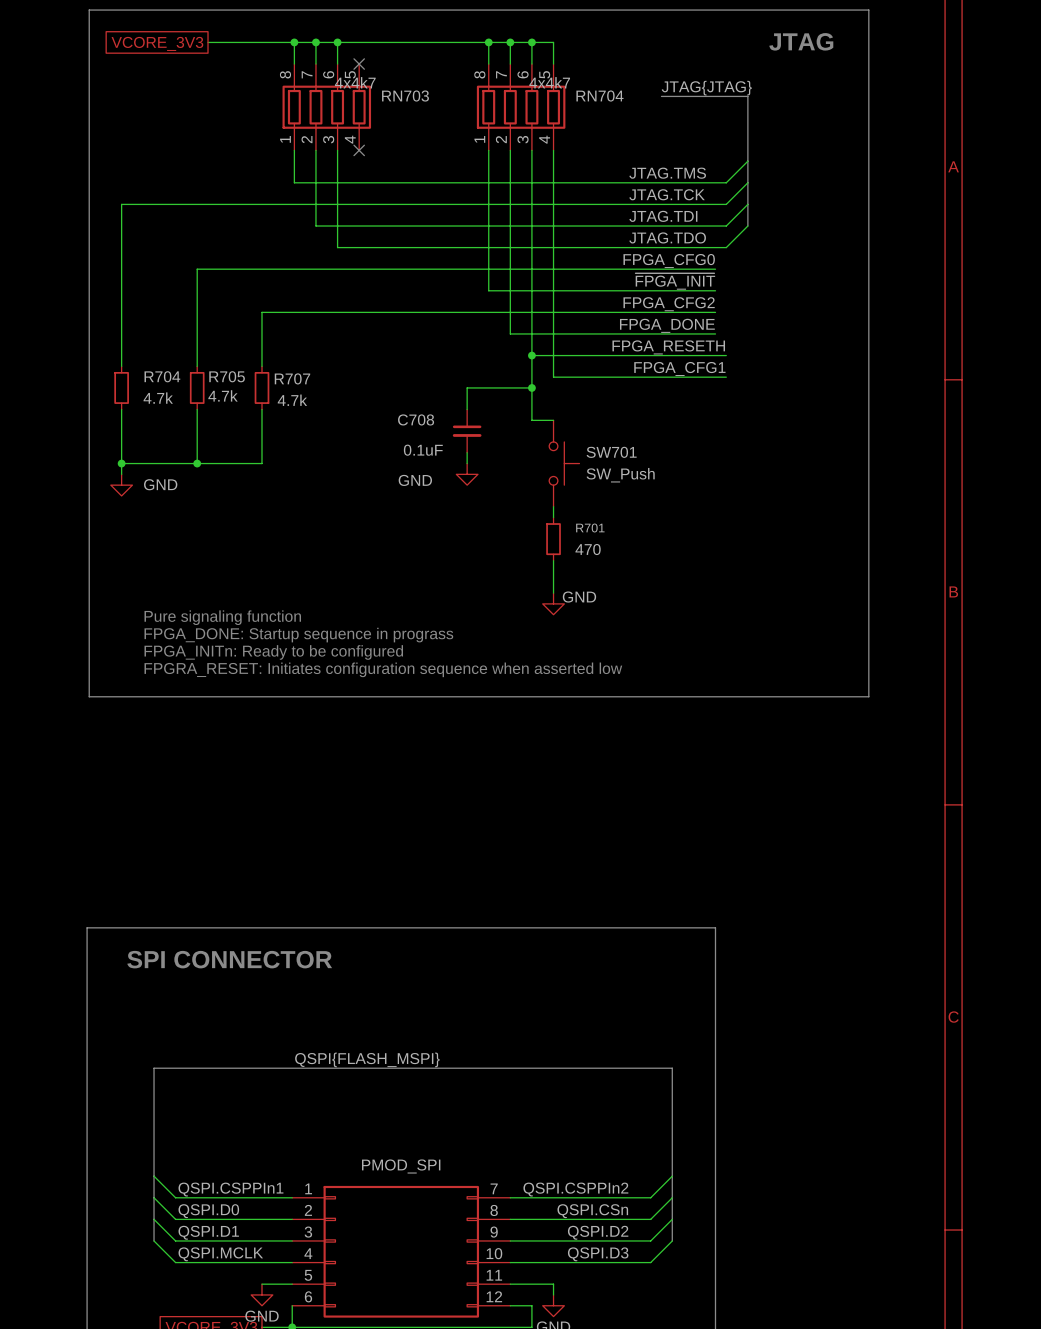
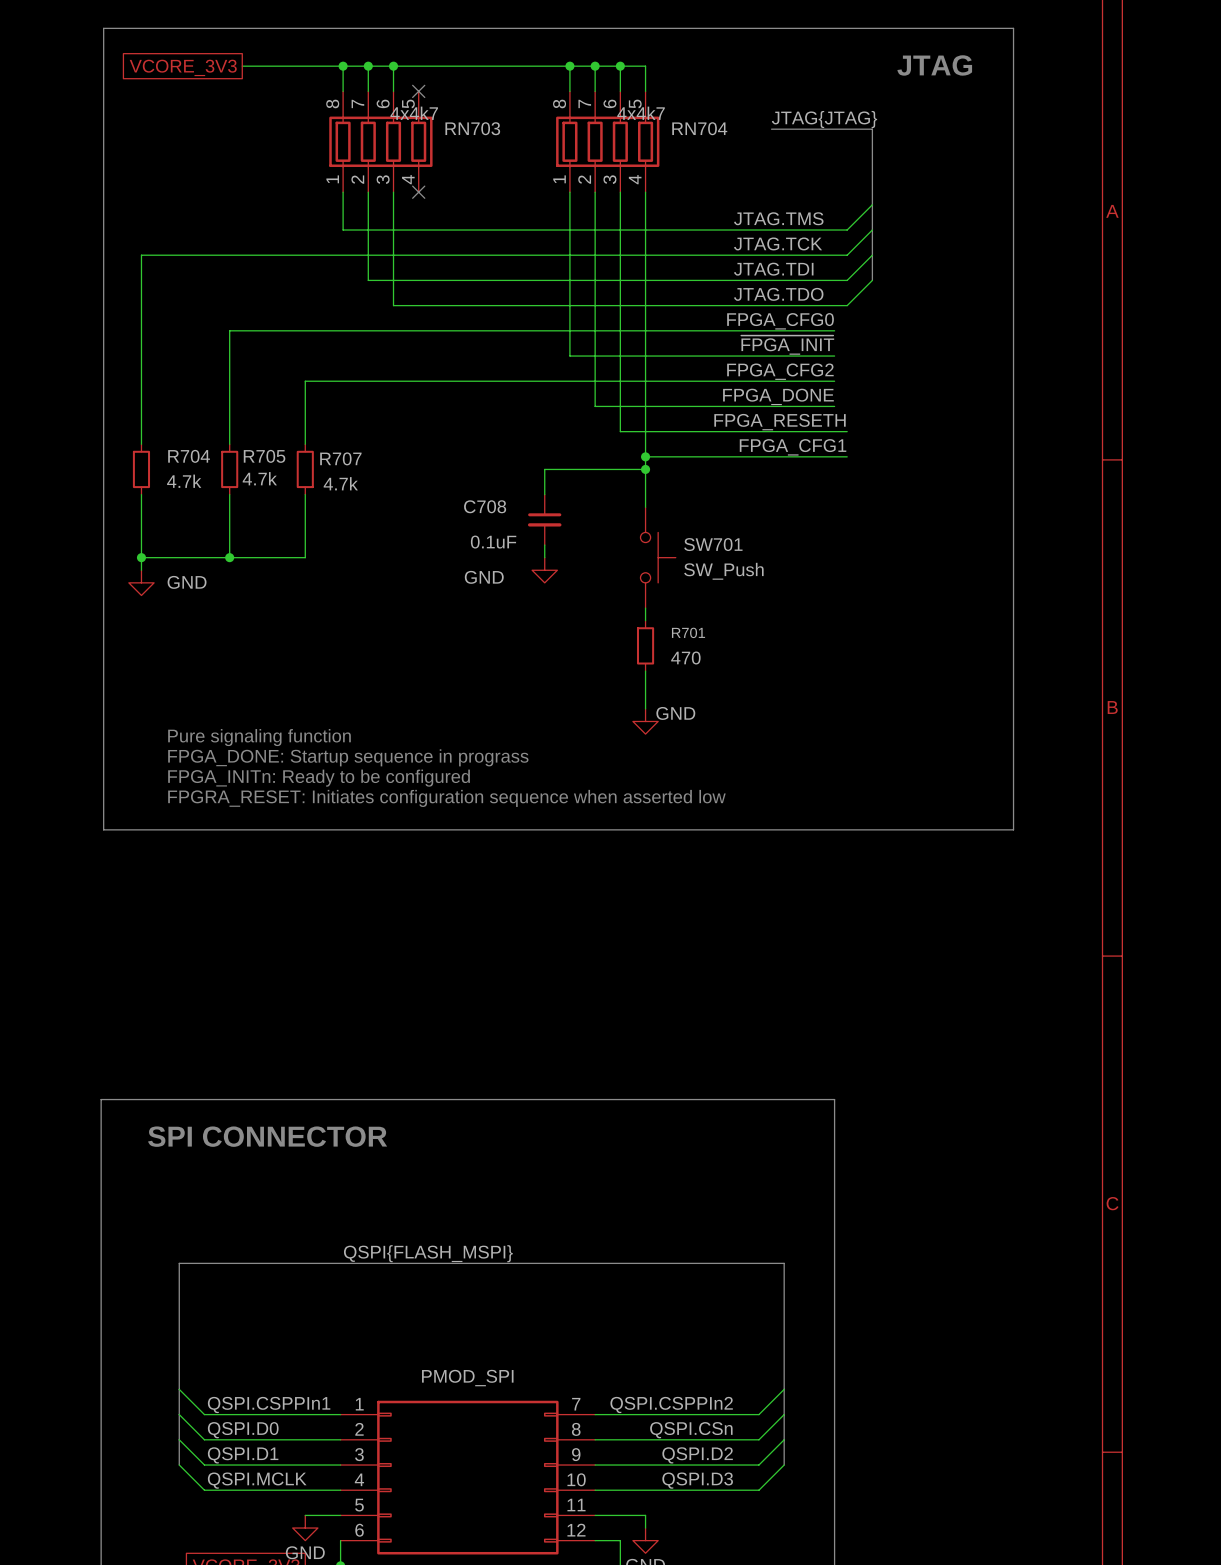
wire: (531, 355) (531, 420) (553, 420) -> (645, 456) (645, 507)
junction: (531, 355) -> none
junction: none -> (645, 456)
wire: none -> (620, 469) (645, 469)
junction: (531, 387) -> none
junction: none -> (645, 469)

